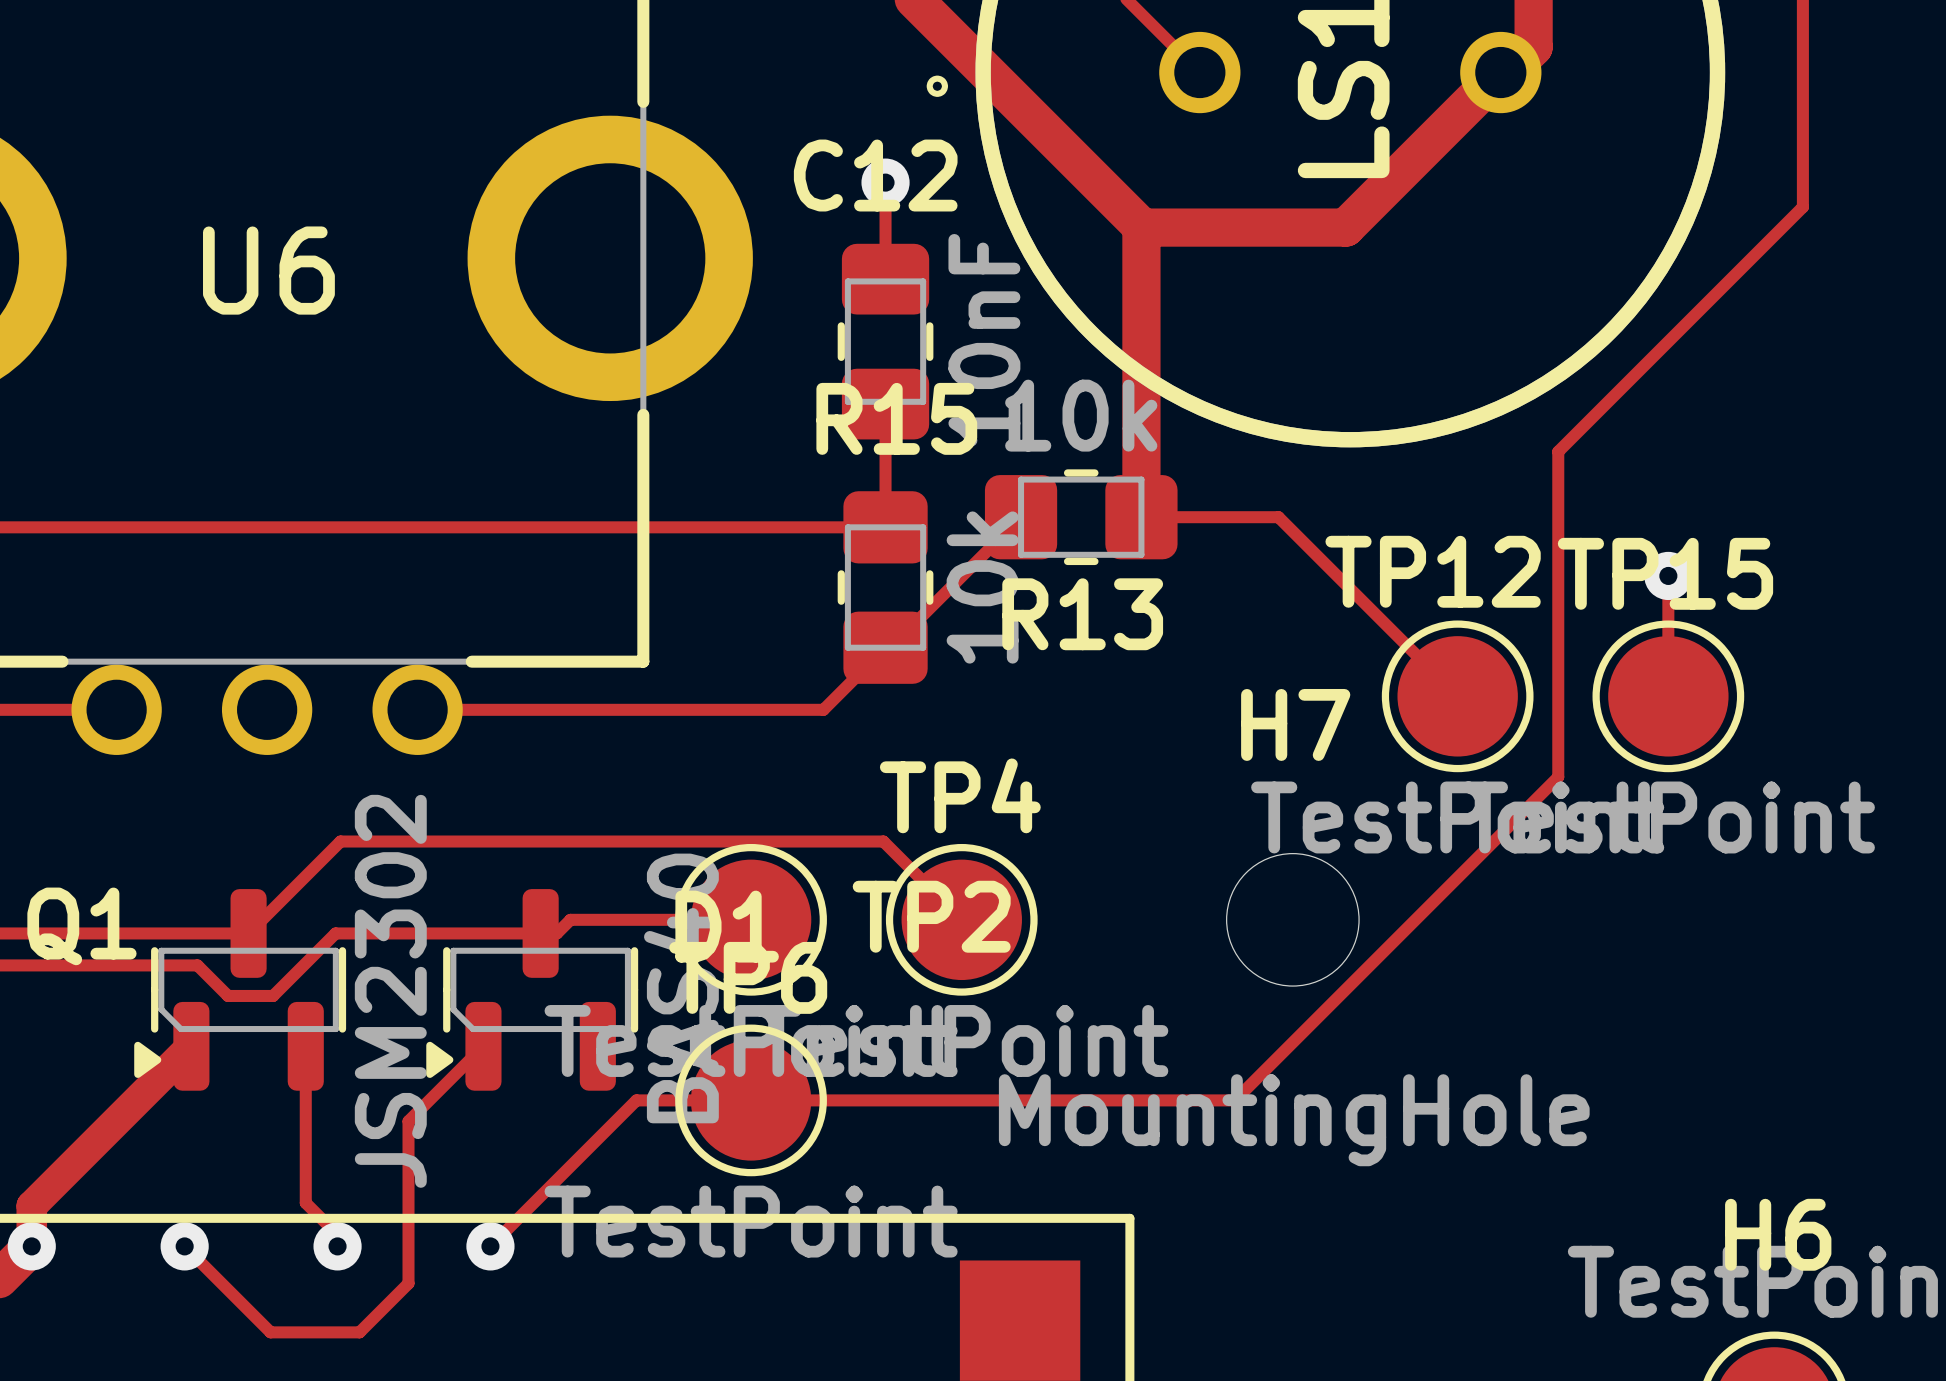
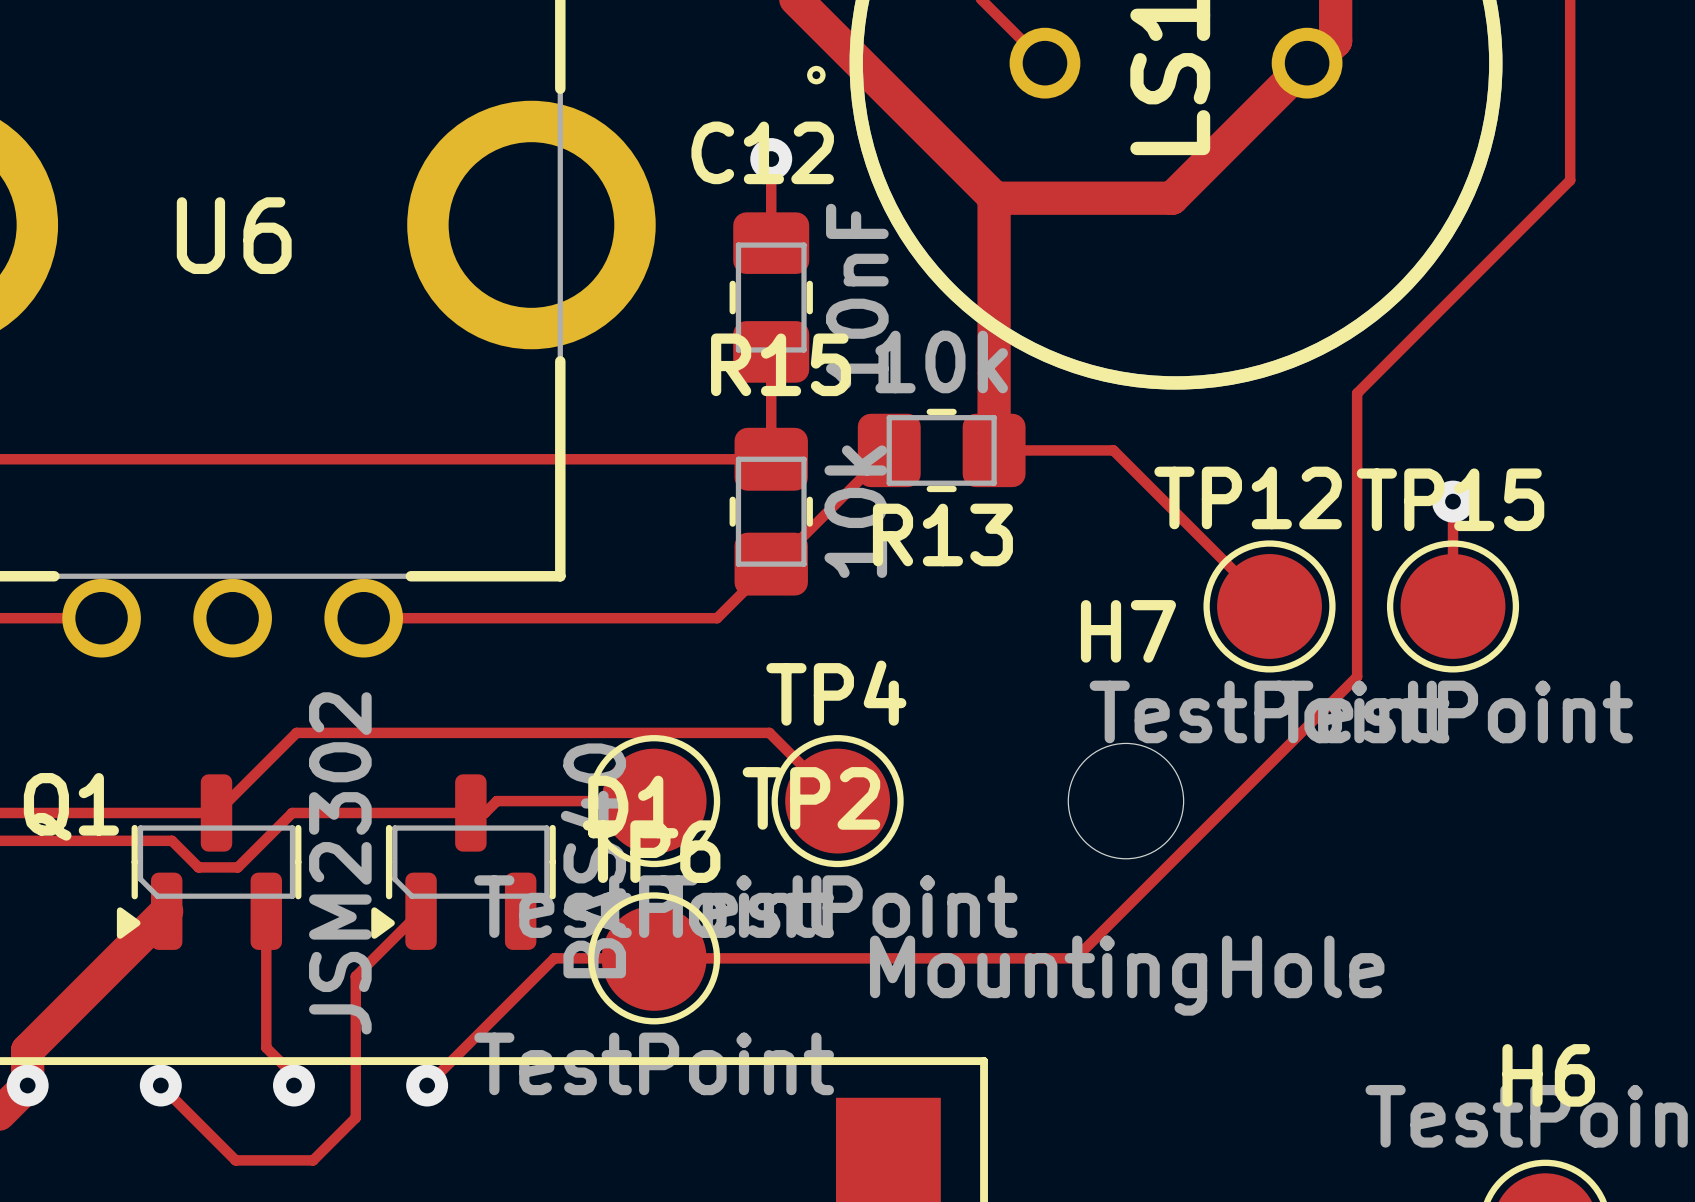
track width: thin (191, 1046) (31, 1205) (31, 1246) -> thick (166, 911) (27, 1050) (27, 1085)

